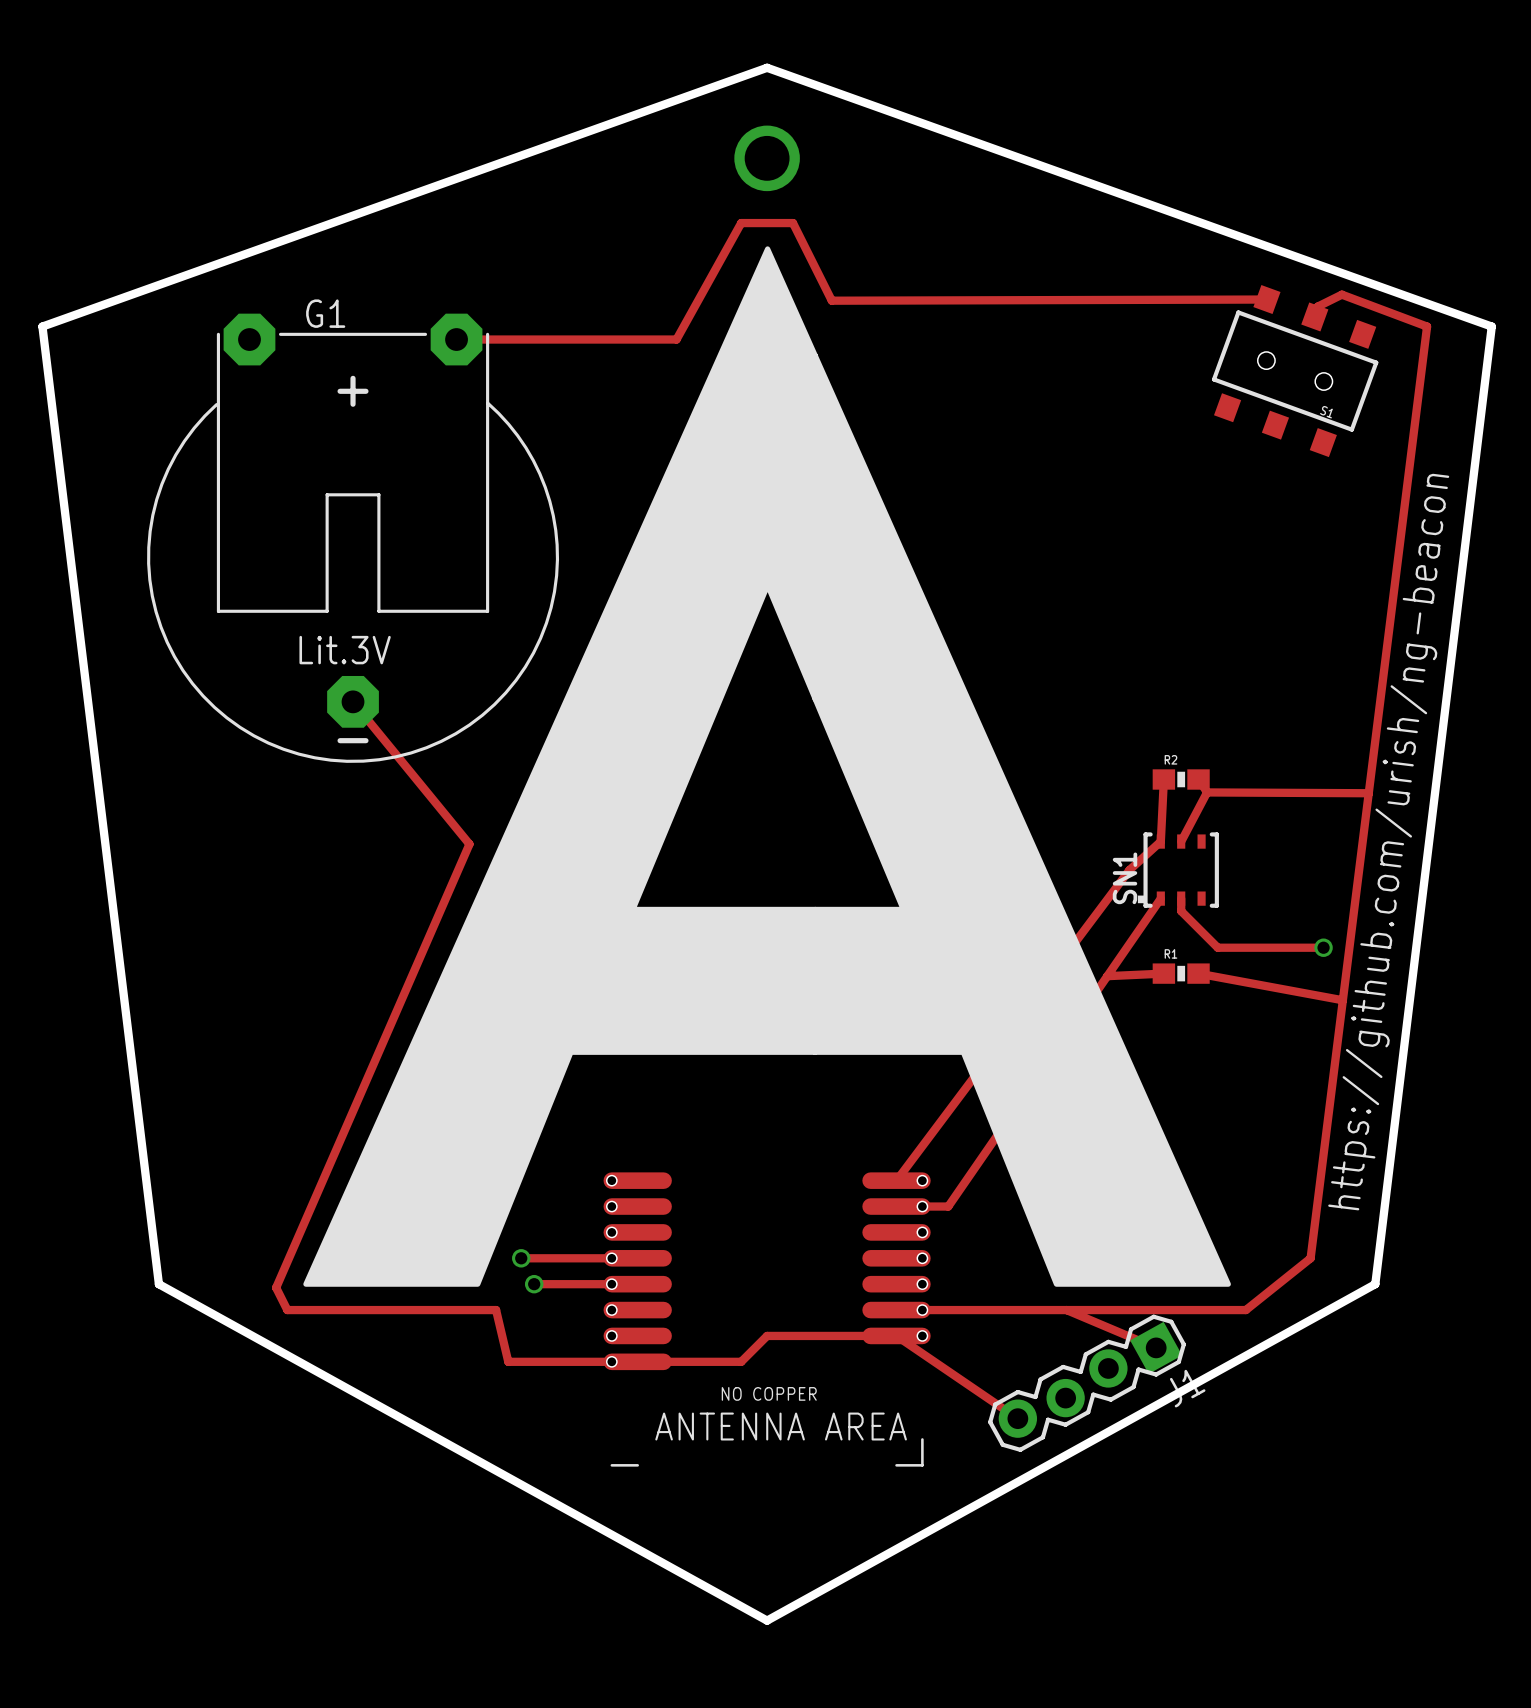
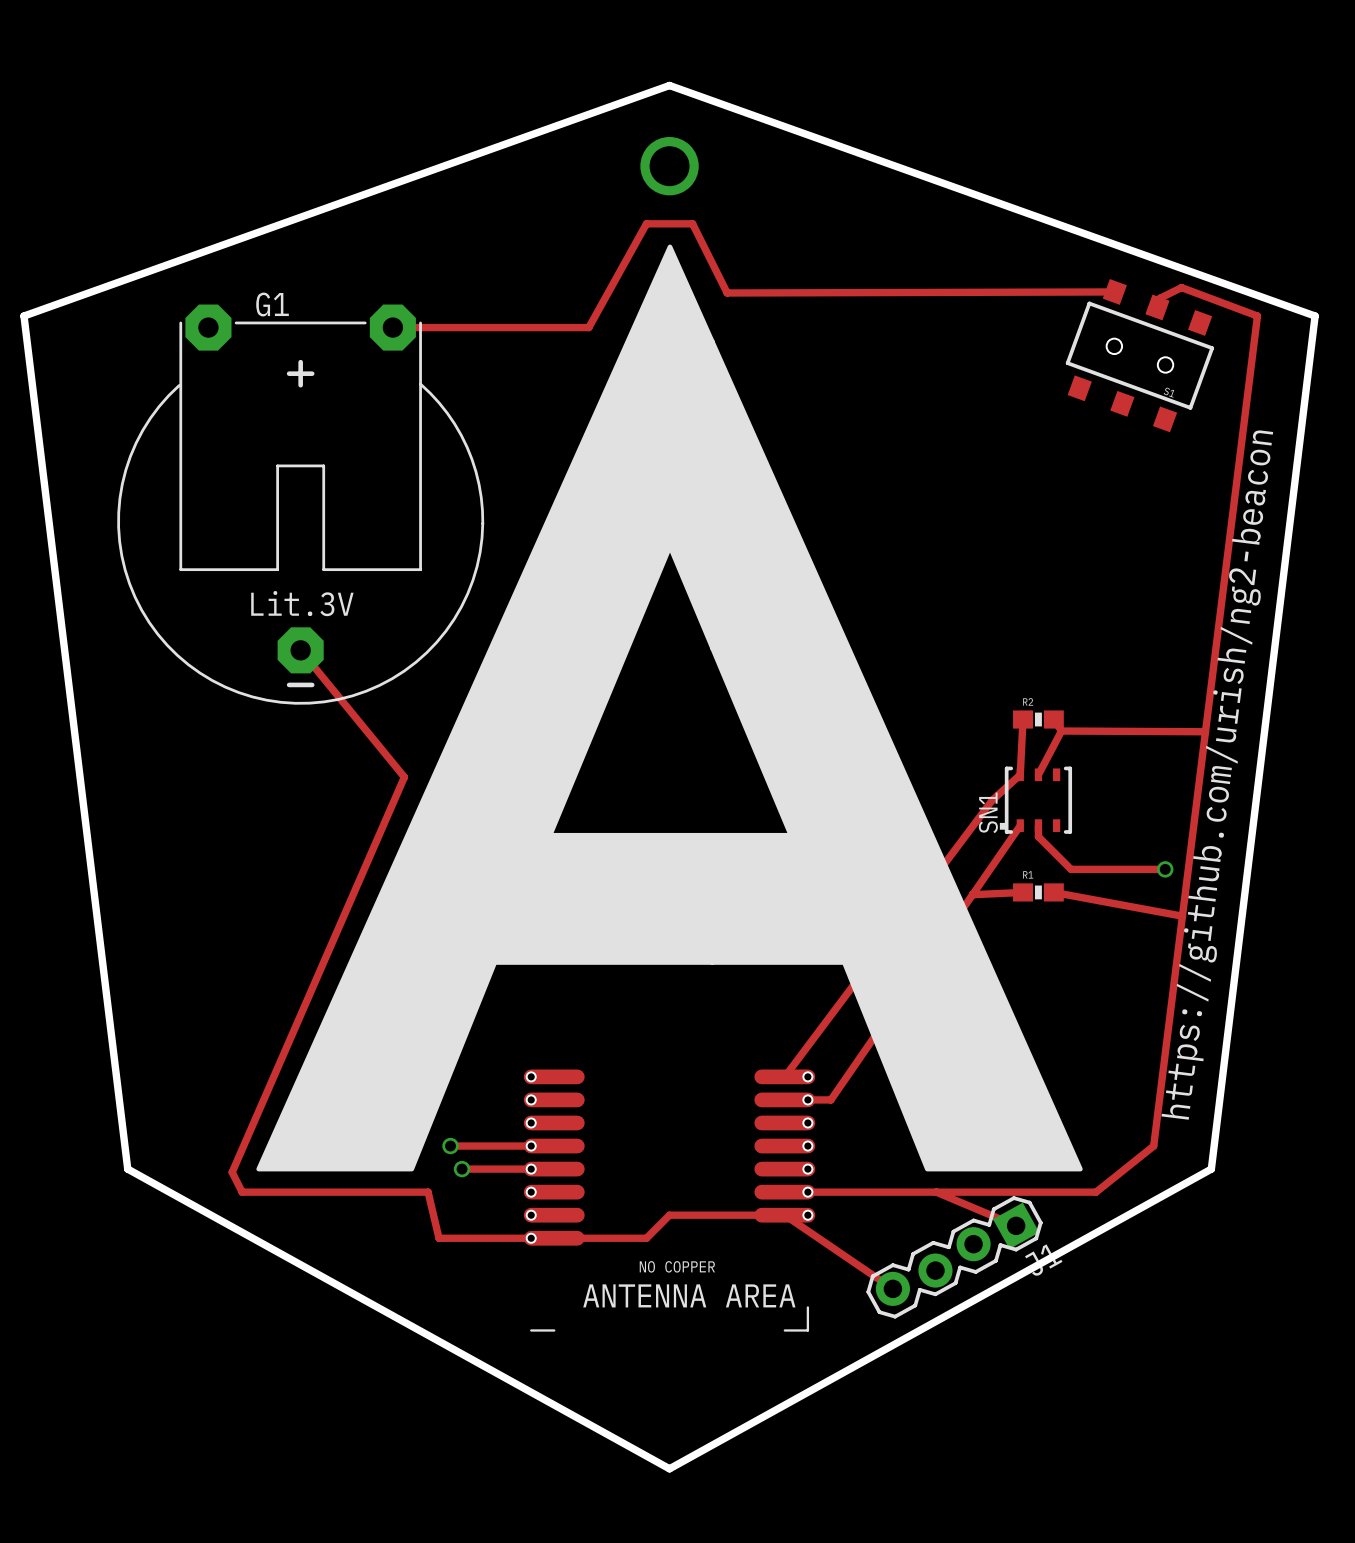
text: https://github.com/urish/ng-beacon (1388, 842) -> https://github.com/urish/ng2-beacon (1217, 774)

